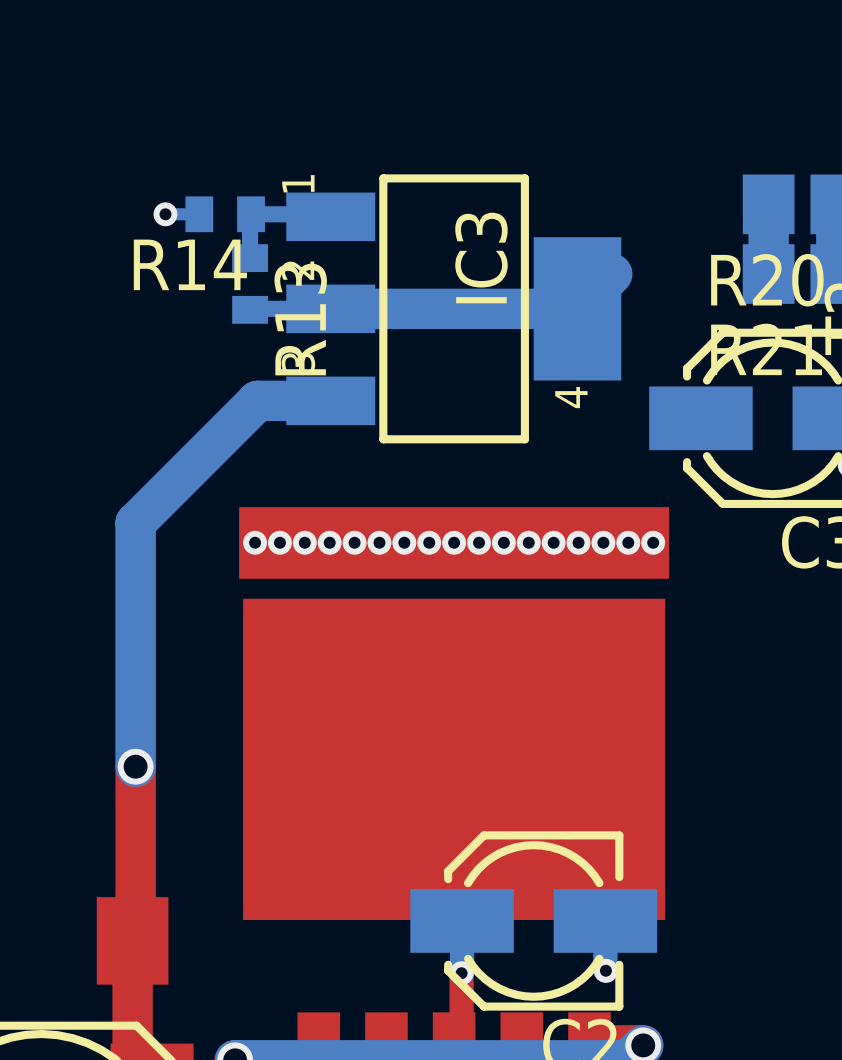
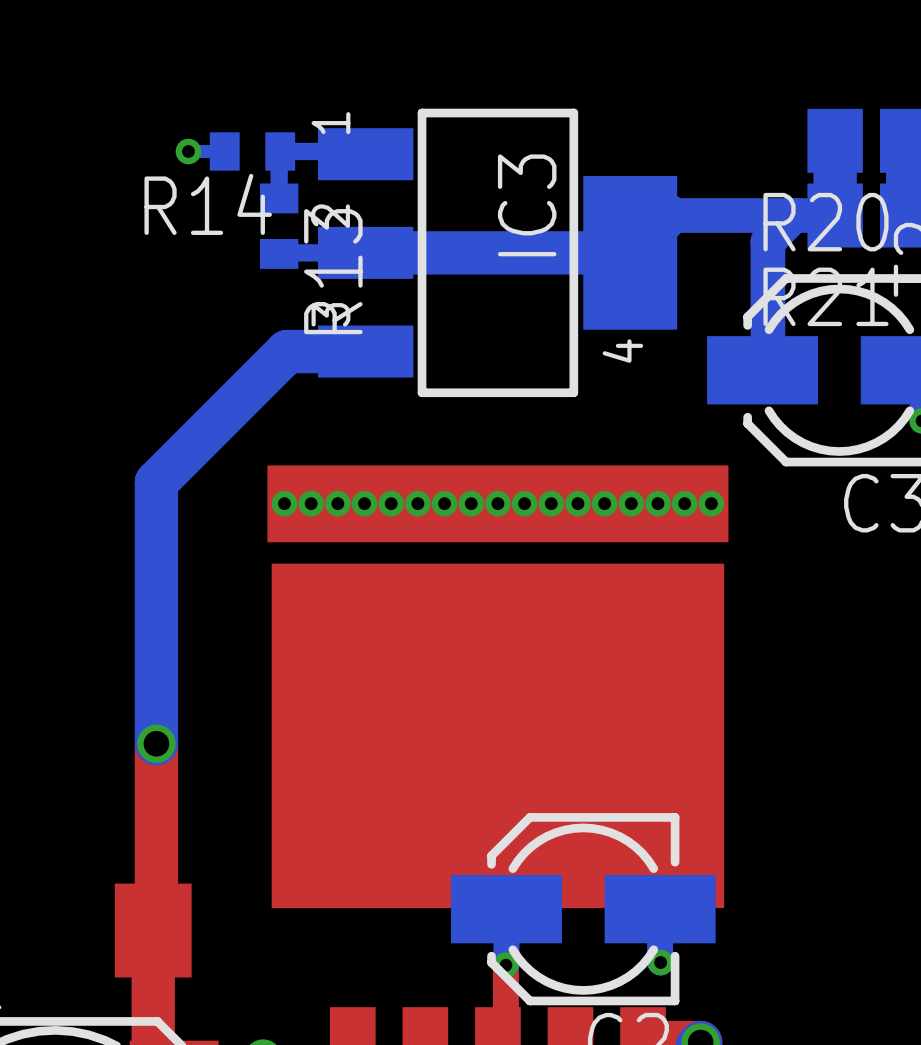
bottom track: none -> (794, 215) (767, 241) (767, 364)
bottom track: none -> (835, 215) (667, 215)

